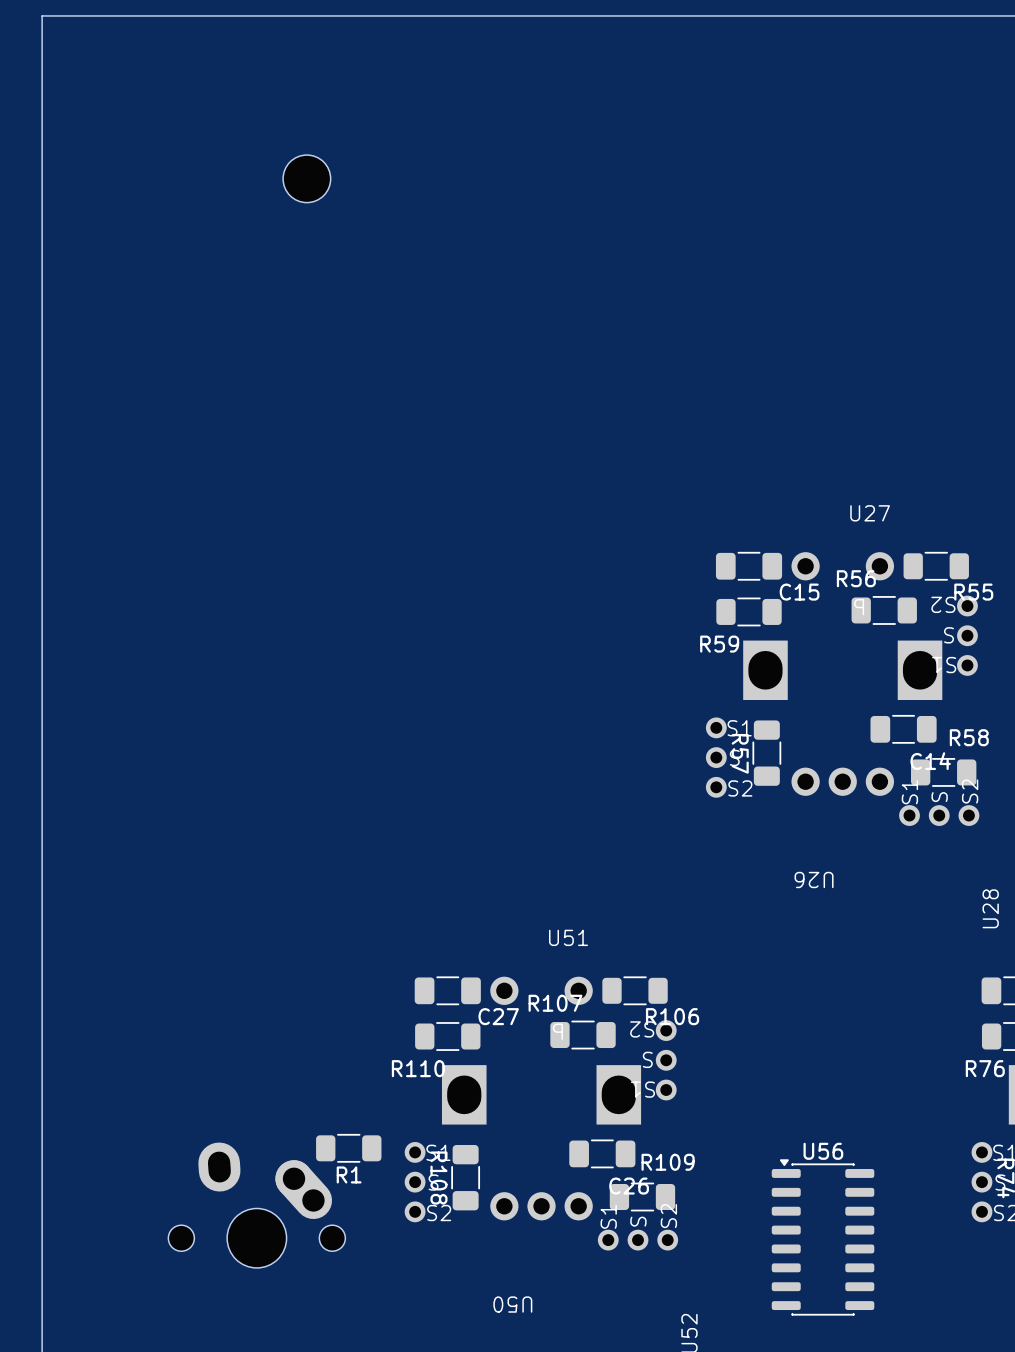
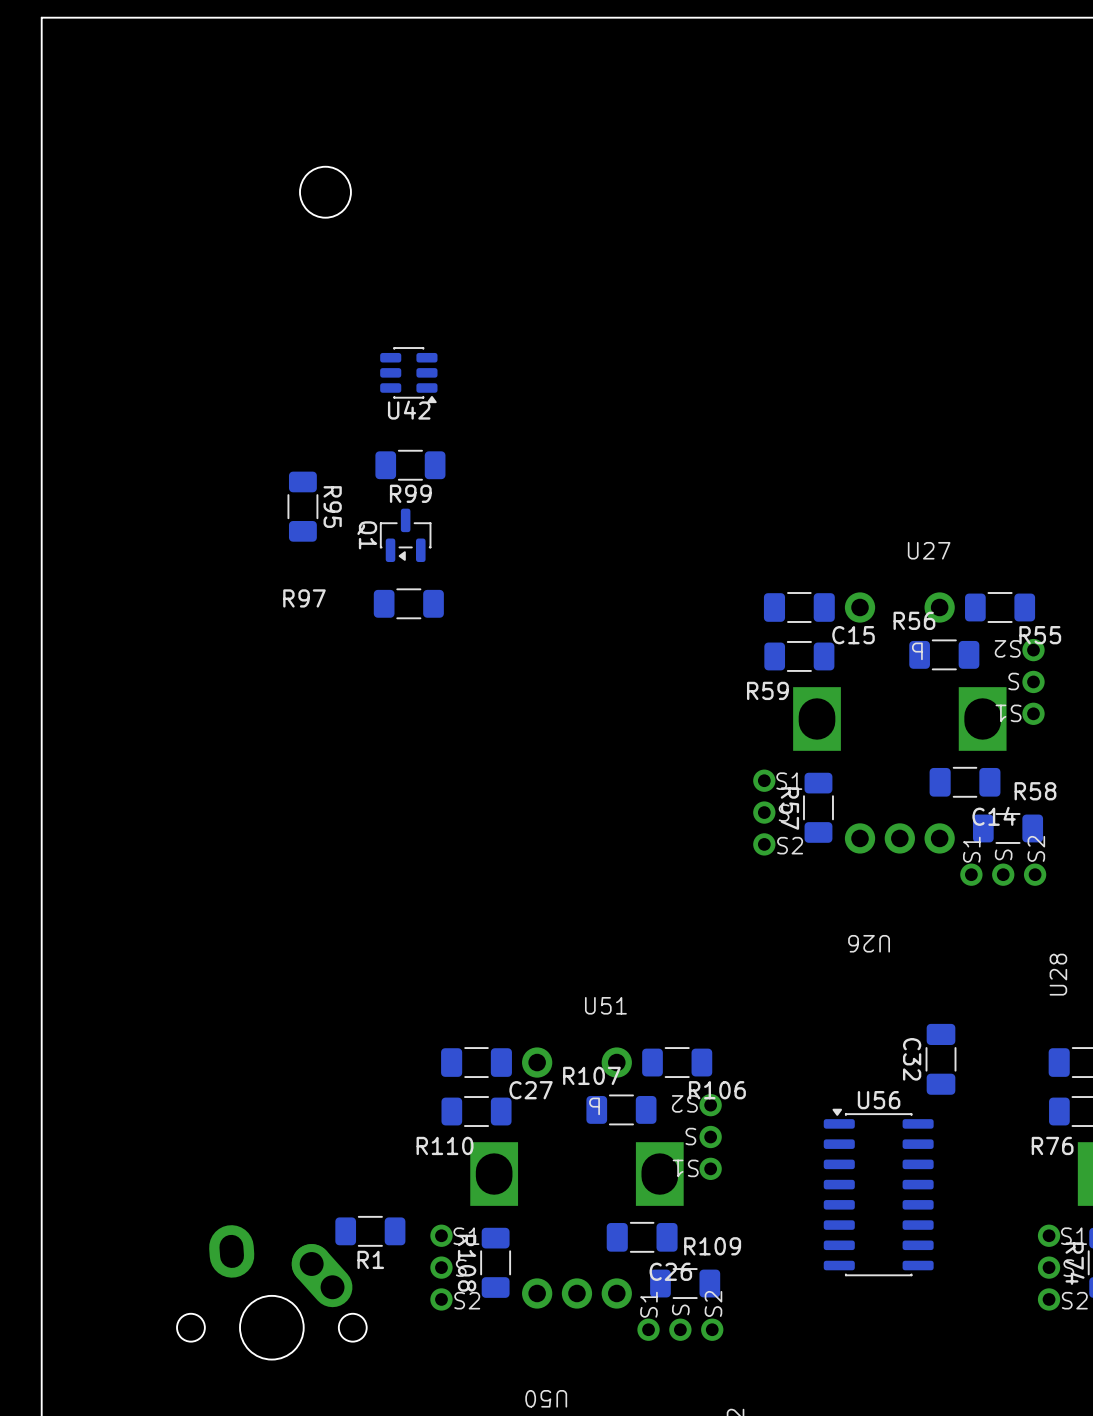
U42: none -> (408, 375)
R99: none -> (410, 465)
R95: none -> (302, 506)
Q1: none -> (405, 535)
R97: none -> (408, 603)
C32: none -> (941, 1059)
U56 position: (823, 1237) -> (878, 1192)

